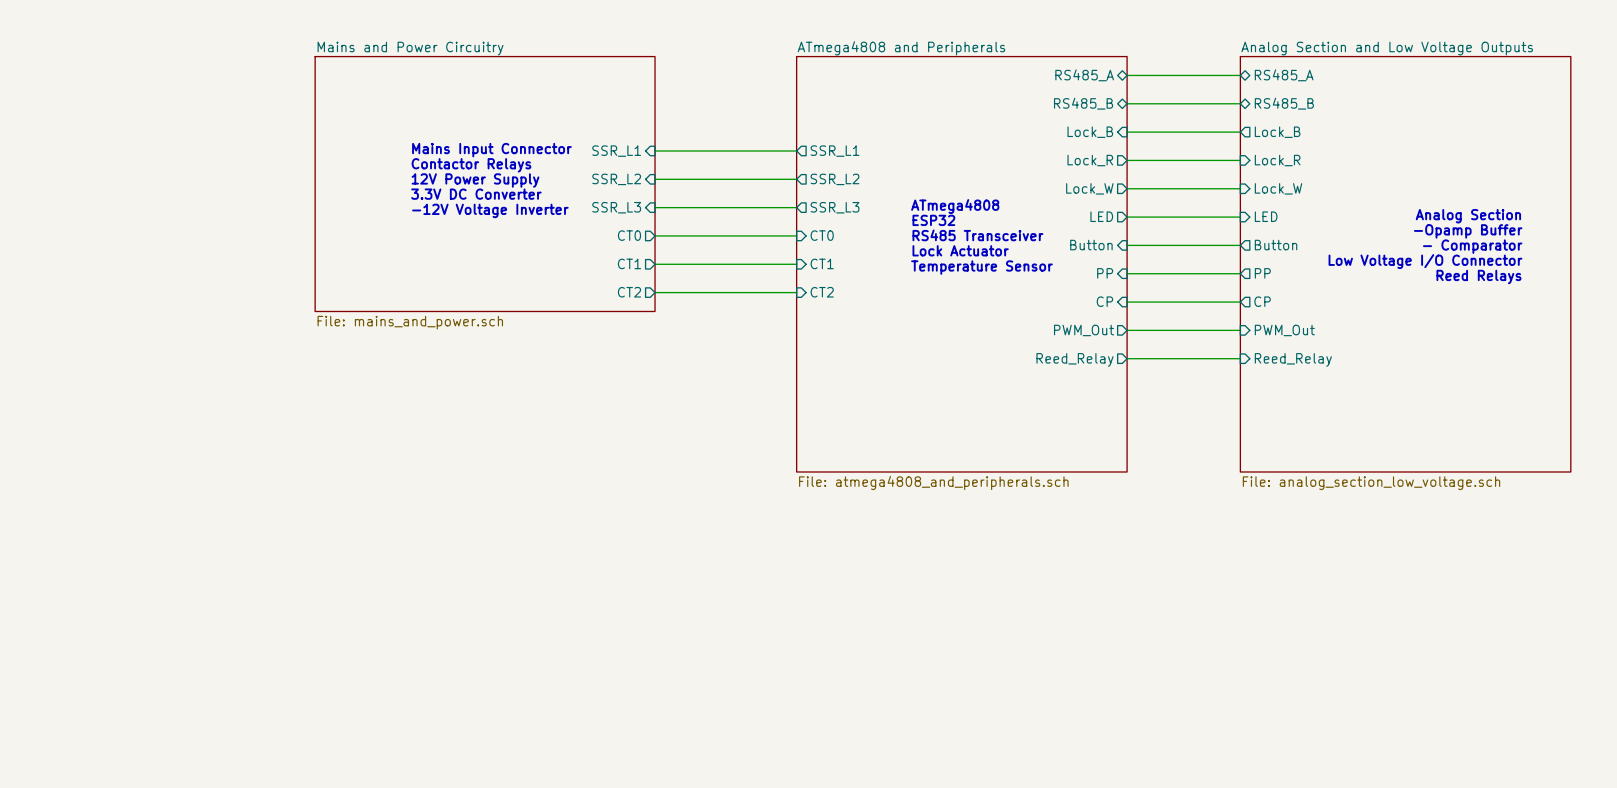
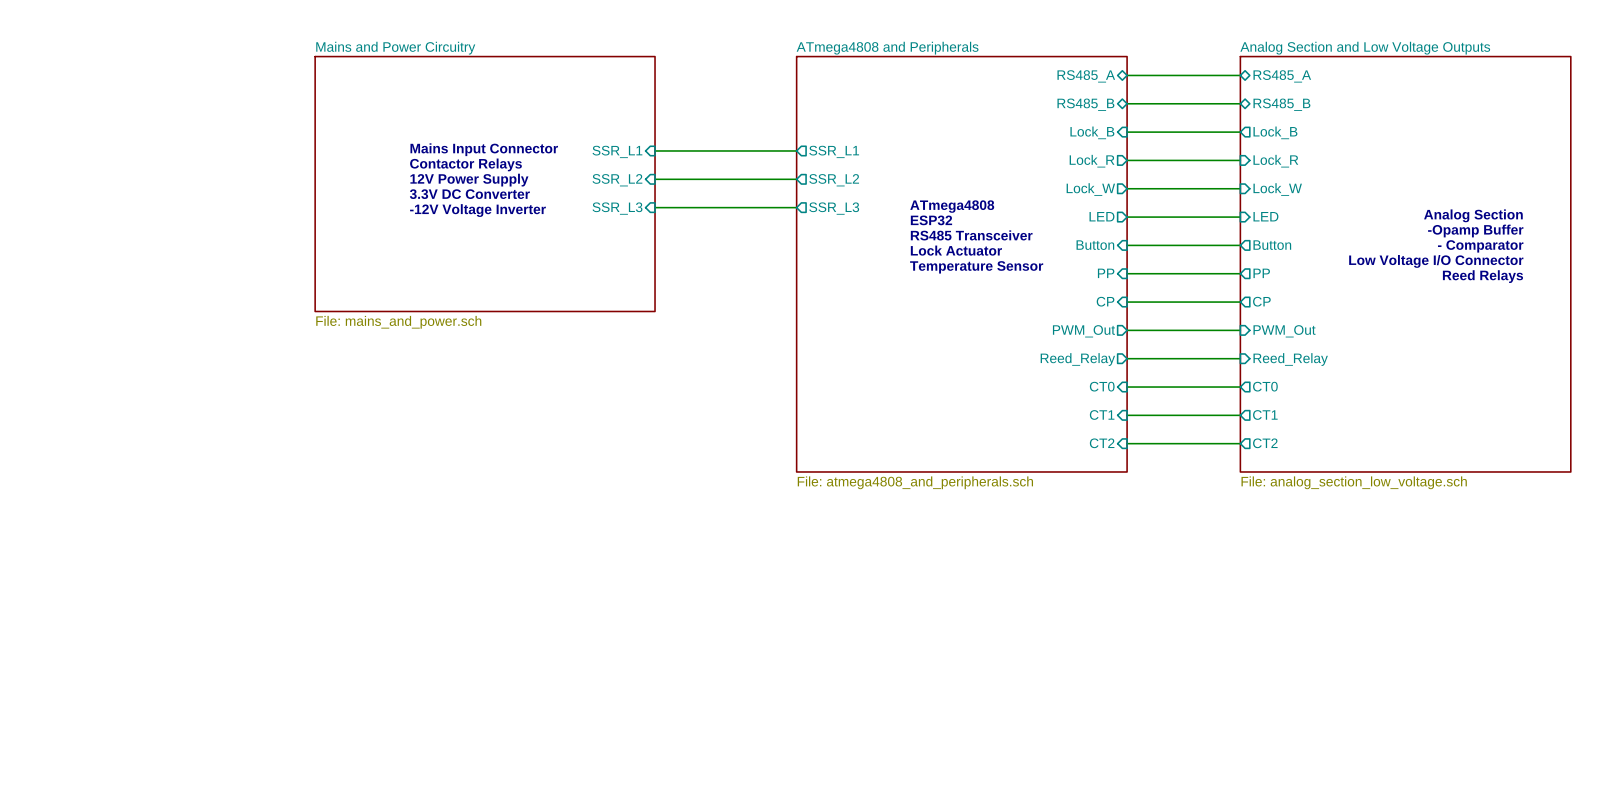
sheet pin: CT0 (629, 235) -> none
wire: (655, 235) (796, 235) -> none
sheet pin: CT0 (822, 235) -> none
sheet pin: CT1 (629, 263) -> none
sheet pin: CT1 (822, 263) -> none
wire: (655, 264) (796, 264) -> none
sheet pin: CT2 (629, 292) -> none
wire: (655, 292) (796, 292) -> none
sheet pin: CT2 (822, 292) -> none
sheet pin: none -> CT0 (1102, 386)
sheet pin: none -> CT0 (1265, 386)
wire: none -> (1127, 387) (1240, 387)
sheet pin: none -> CT1 (1102, 414)
sheet pin: none -> CT1 (1265, 414)
wire: none -> (1127, 415) (1240, 415)
sheet pin: none -> CT2 (1102, 443)
wire: none -> (1127, 443) (1240, 443)
sheet pin: none -> CT2 (1265, 443)

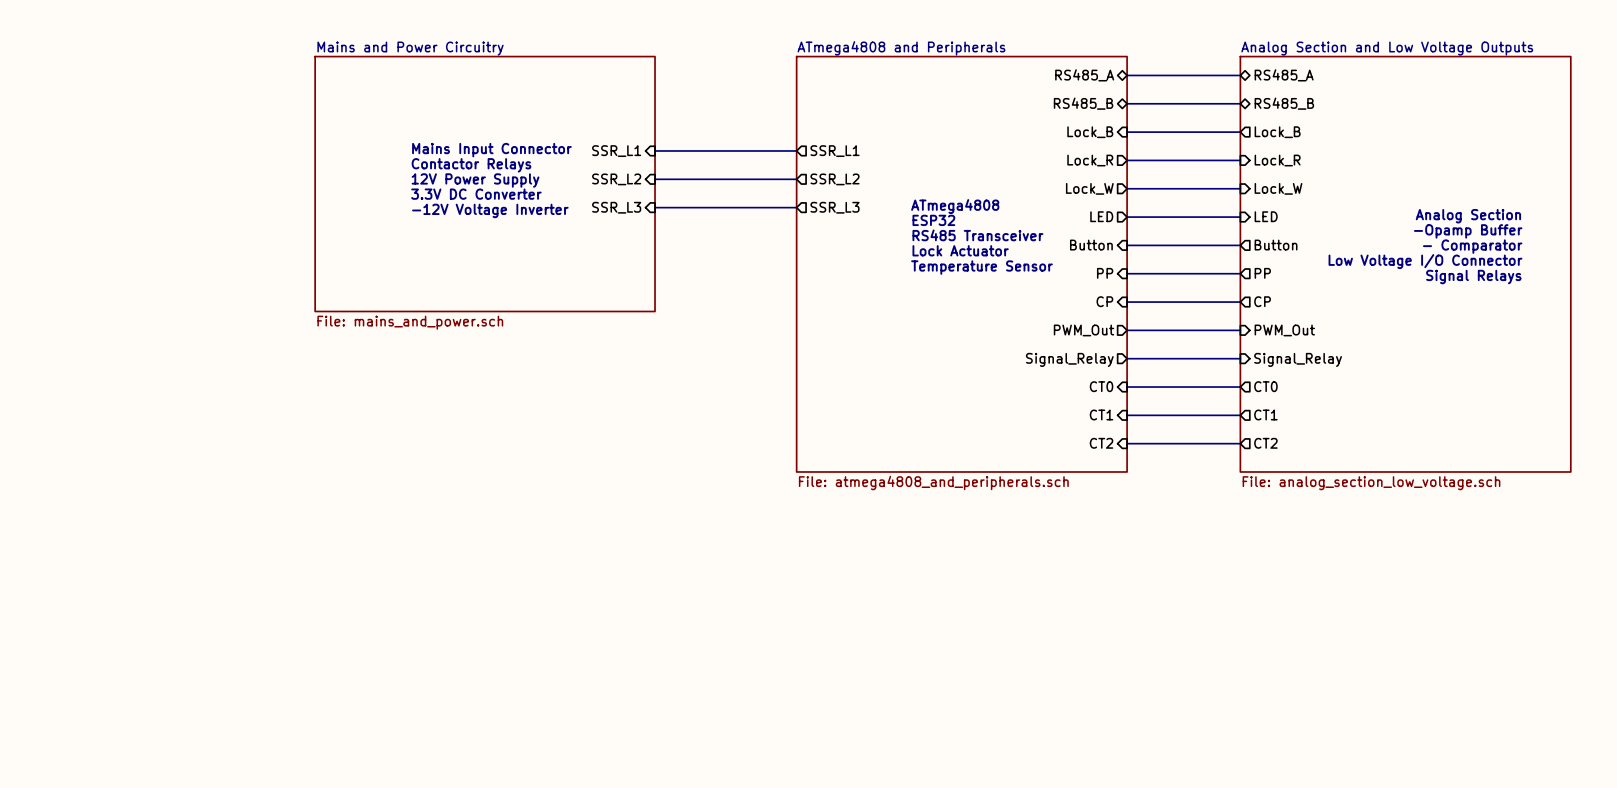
text: Reed Relays (1482, 276) -> Signal Relays (1473, 277)
sheet pin: Reed_Relay (1077, 359) -> Signal_Relay (1069, 359)
sheet pin: Reed_Relay (1290, 359) -> Signal_Relay (1298, 359)

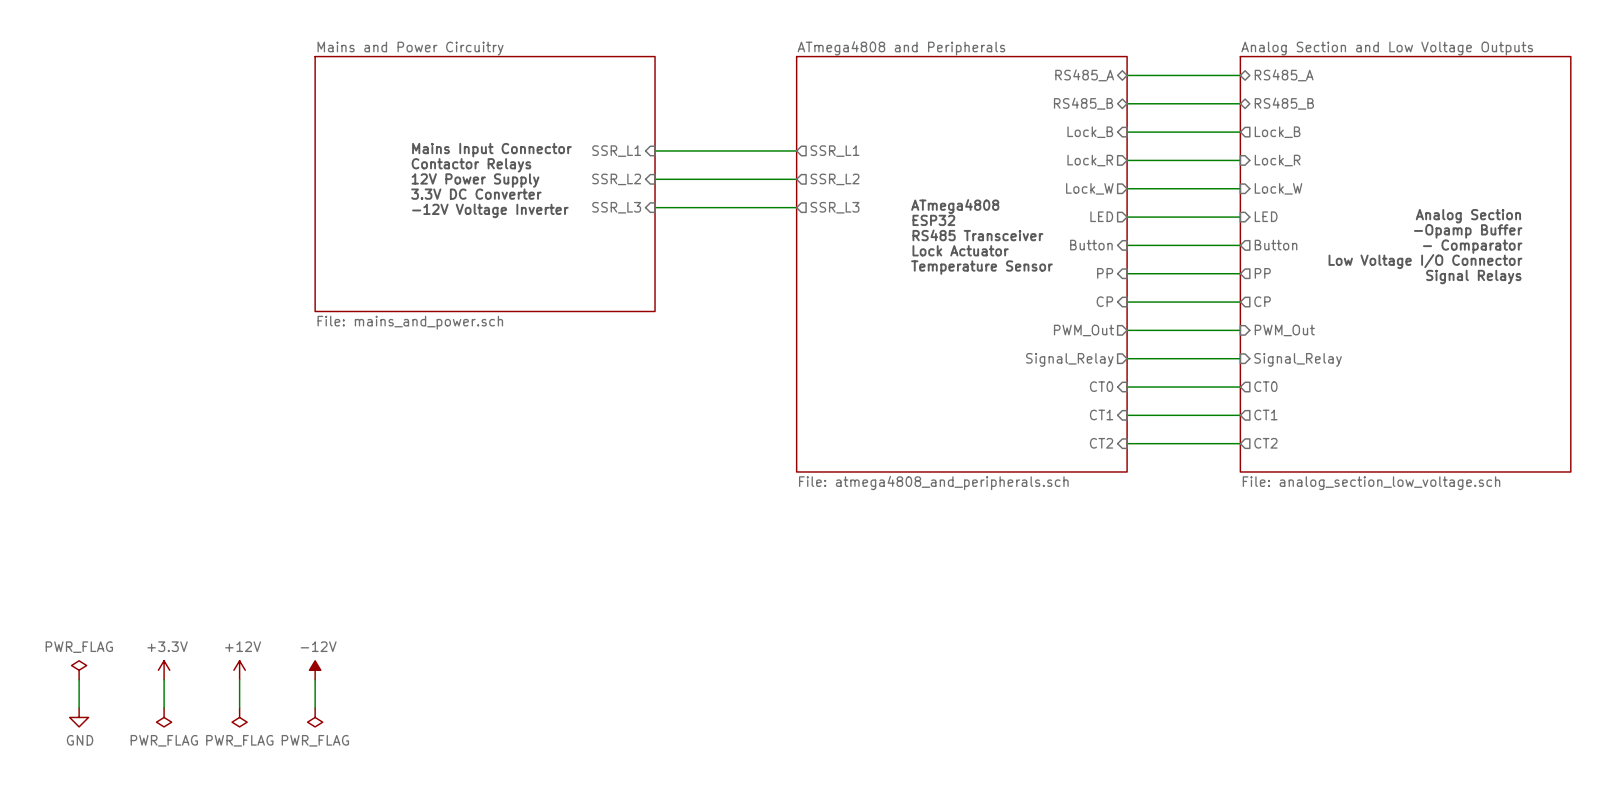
power symbol: none -> PWR_FLAG (79, 670)
power symbol: none -> +3.3V (164, 670)
power symbol: none -> +12V (239, 670)
power symbol: none -> -12V (315, 670)
wire: none -> (79, 679) (79, 708)
wire: none -> (164, 679) (164, 708)
wire: none -> (239, 679) (239, 708)
wire: none -> (315, 679) (315, 708)
power symbol: none -> GND (79, 717)
power symbol: none -> PWR_FLAG (164, 717)
power symbol: none -> PWR_FLAG (239, 717)
power symbol: none -> PWR_FLAG (315, 717)

